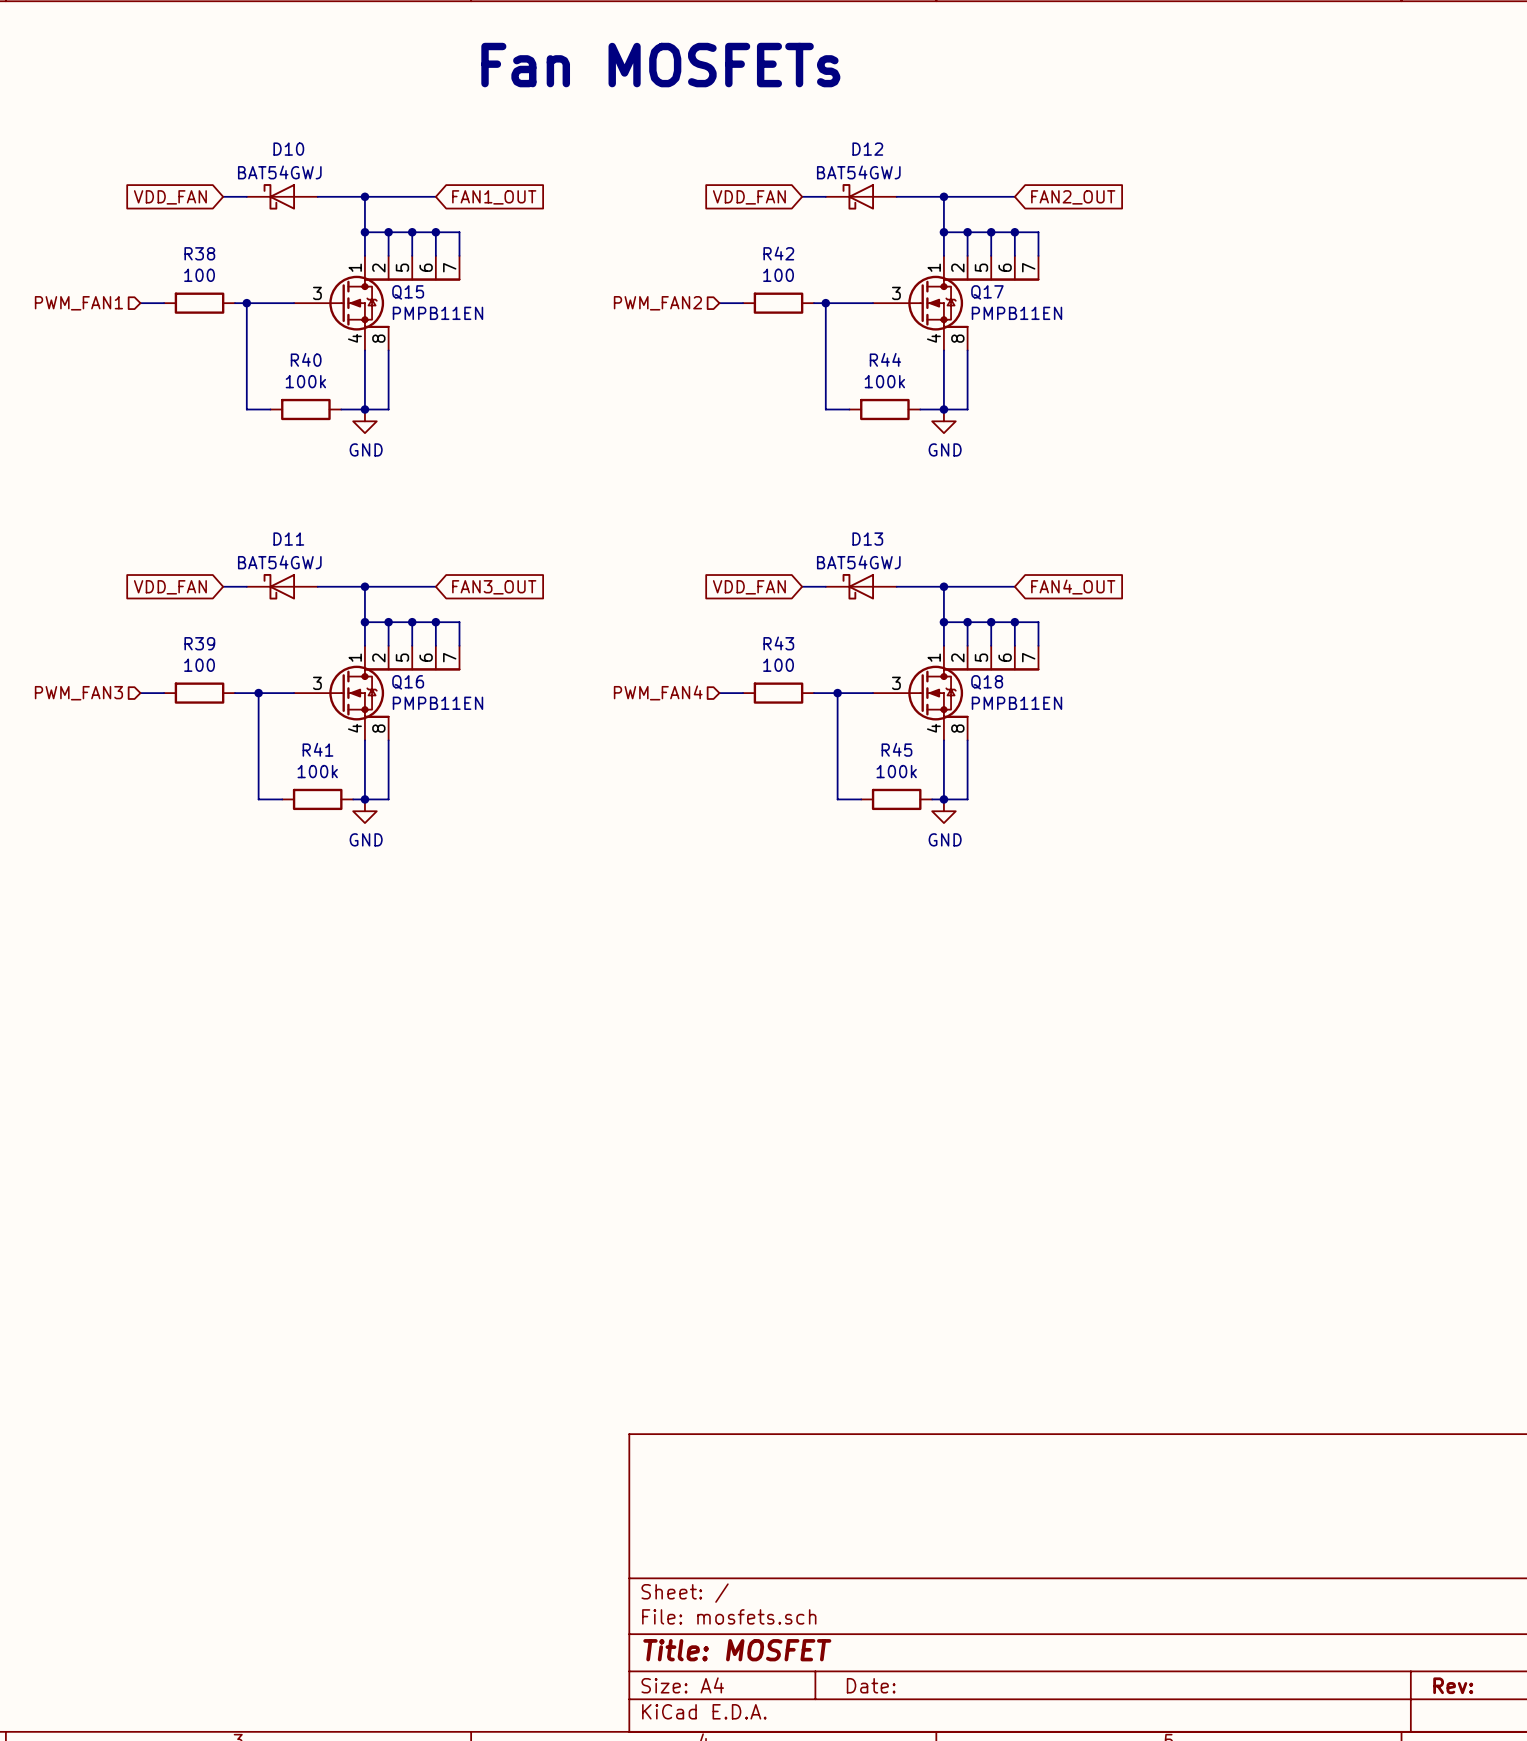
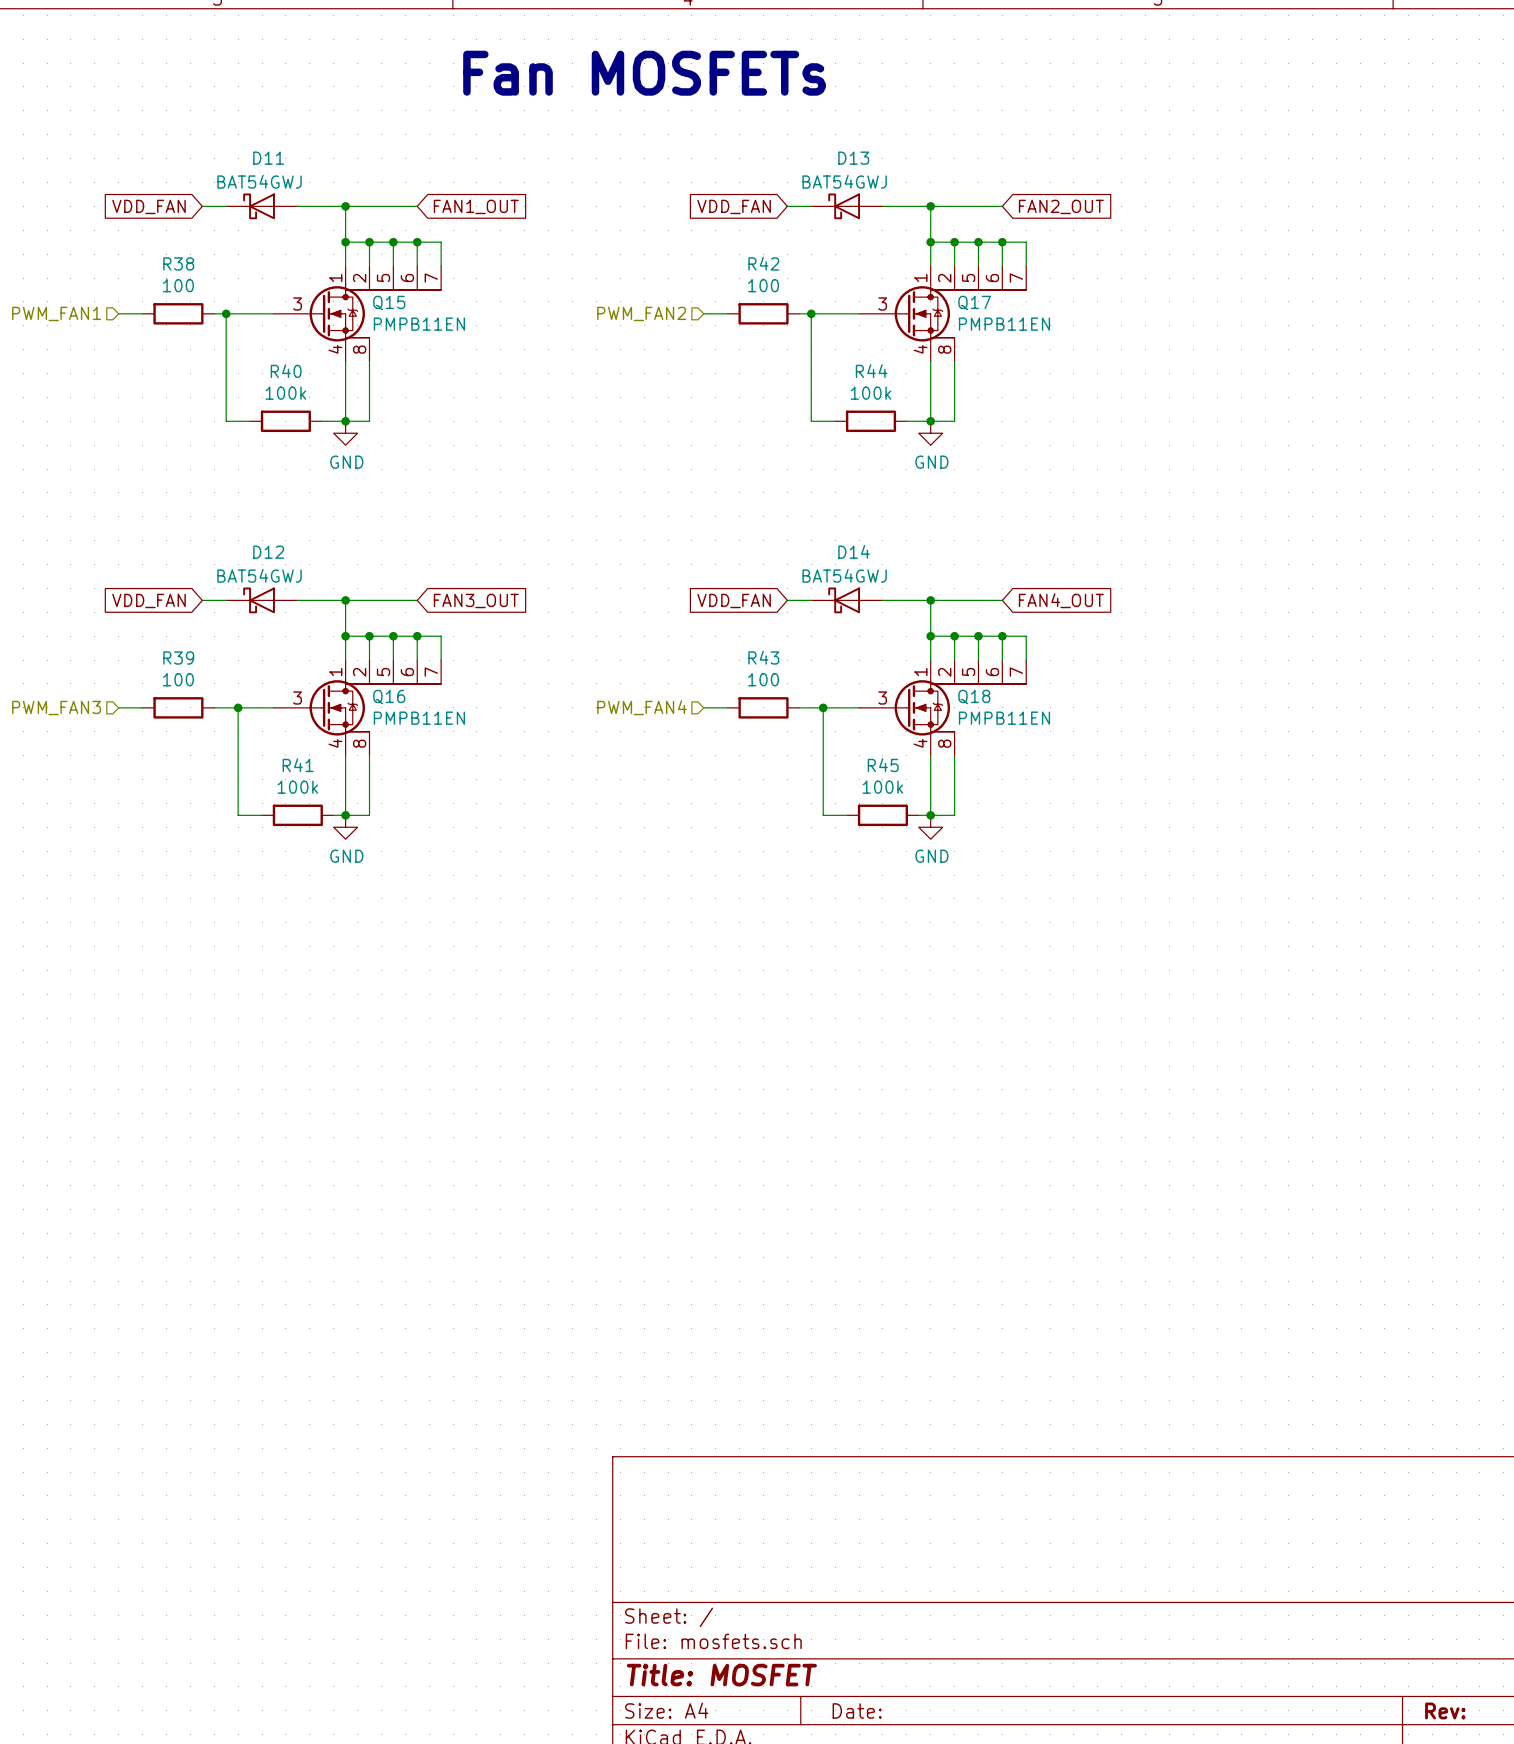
D10 name: D10 (288, 149) -> D11 (268, 158)
D12 name: D12 (867, 149) -> D13 (853, 158)
D11 name: D11 (288, 539) -> D12 (268, 552)
D13 name: D13 (867, 539) -> D14 (854, 551)

